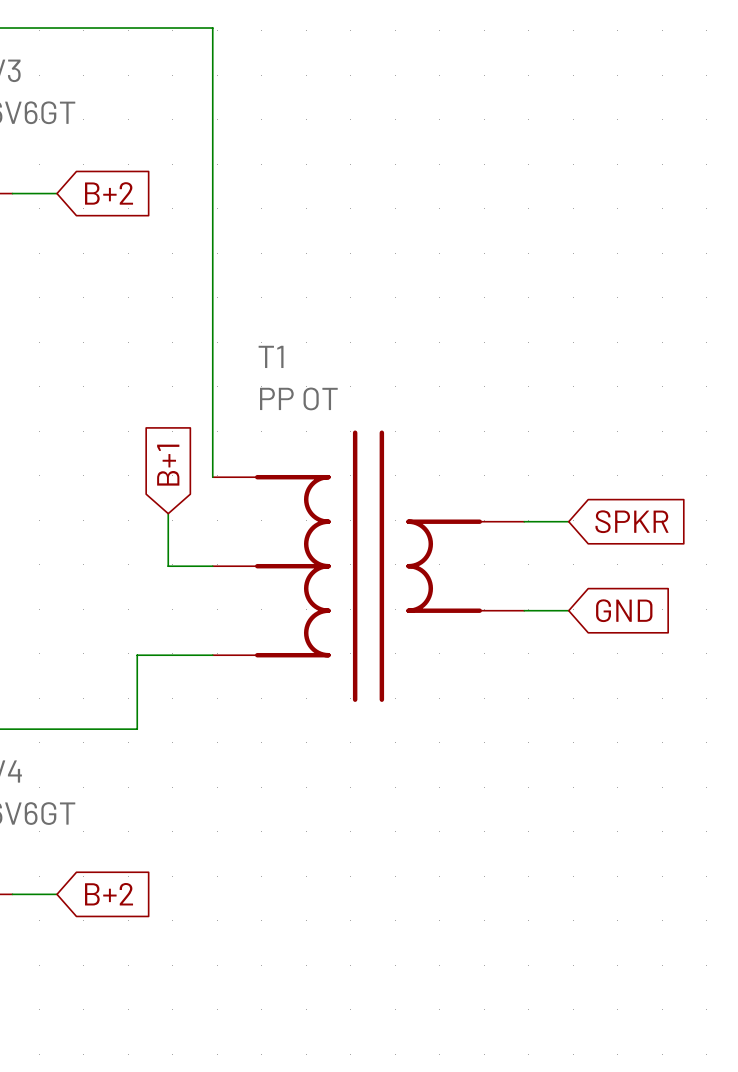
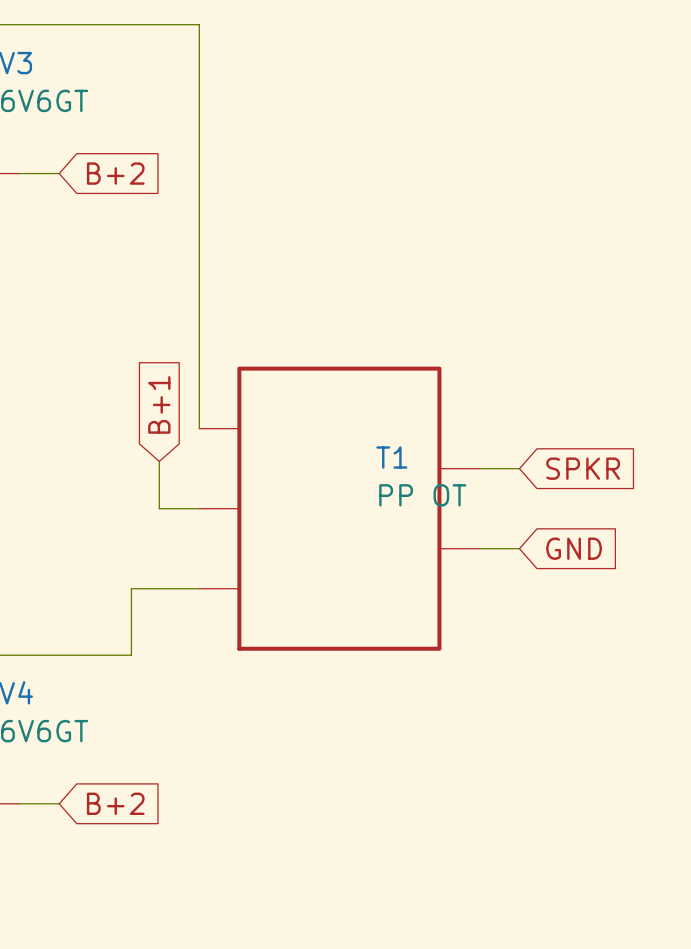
T1 name position: T1 (271, 356) -> T1 (391, 457)
T1 value position: PP OT (298, 398) -> PP OT (422, 495)
T1 symbol: [212, 430, 525, 702] -> [199, 366, 480, 651]

